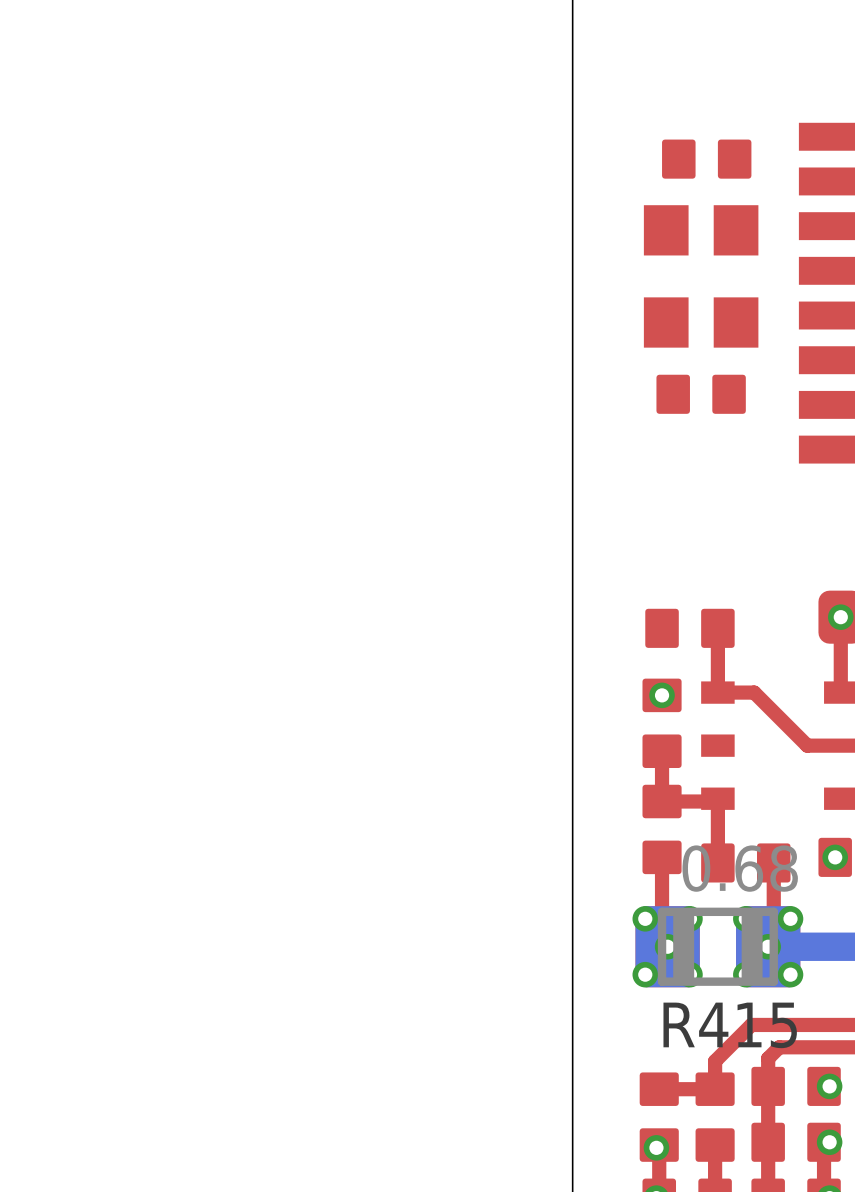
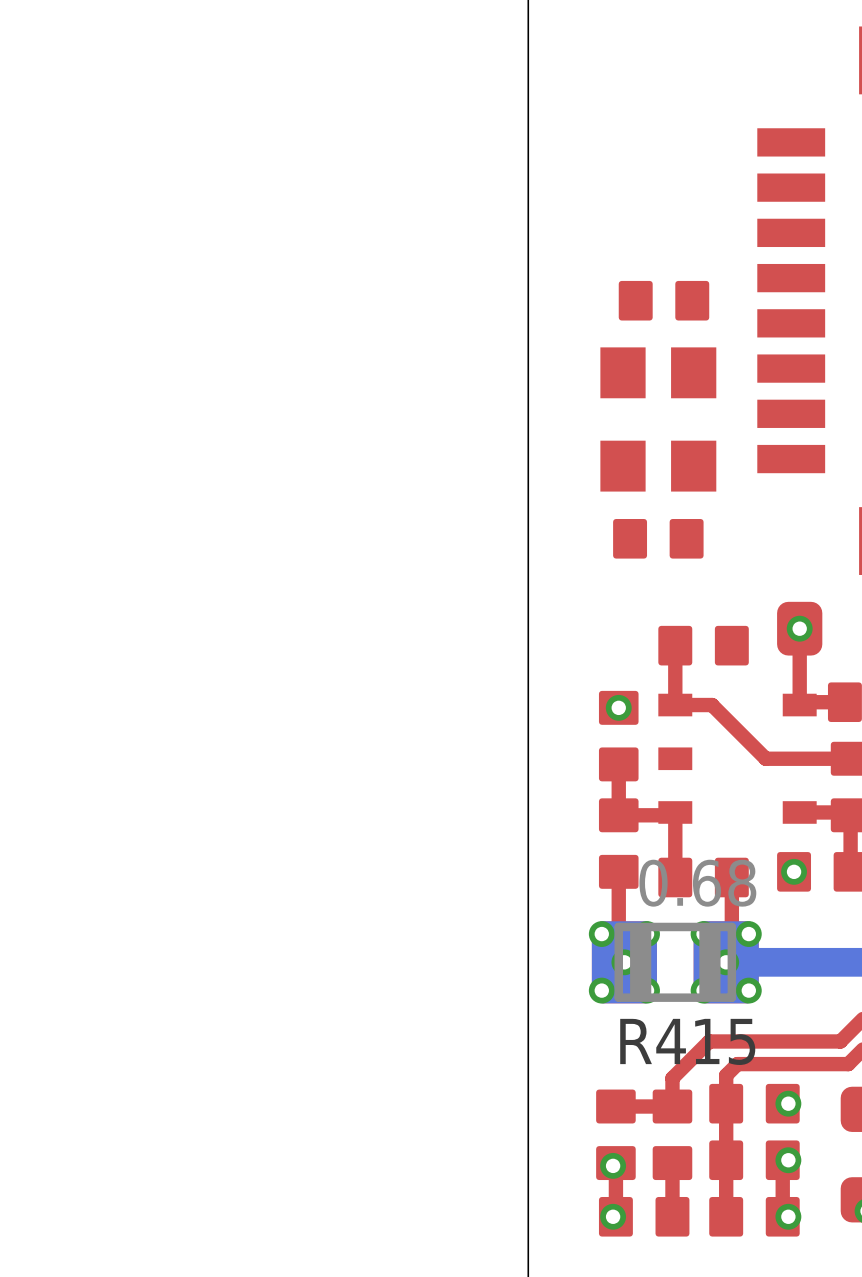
part: (706, 159) -> none
part footprint: [643, 205, 759, 348] -> [618, 280, 710, 321]
part footprint: [656, 374, 746, 414] -> [600, 347, 717, 492]
part: none -> (658, 538)
part: (689, 628) -> none
part: none -> (703, 645)

